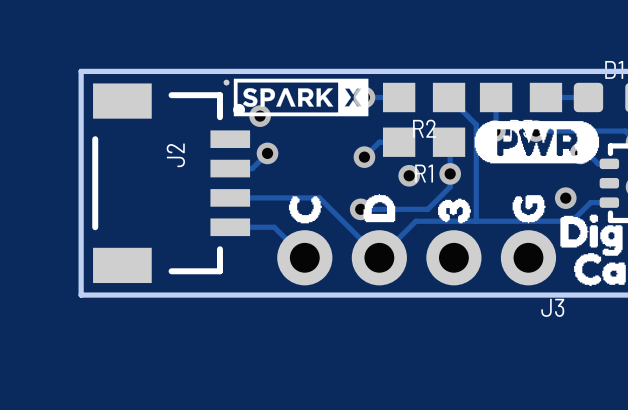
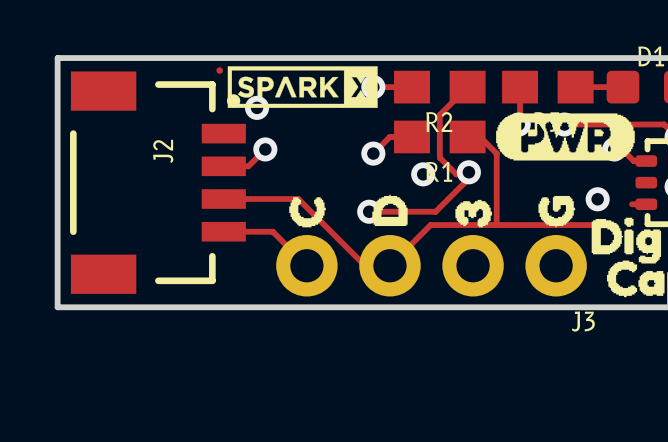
track: (449, 97) (476, 124) (476, 221) -> (467, 136) (480, 136) (496, 153) (496, 225)
track: (449, 142) (450, 186) (427, 209) (420, 209) -> (467, 87) (439, 114) (439, 157) (456, 174) (464, 174) (464, 182) (435, 211)
track: (297, 197) (319, 197) (379, 257) -> (298, 199) (365, 265) (389, 265)
track: (596, 202) (590, 202) (572, 221) -> none

